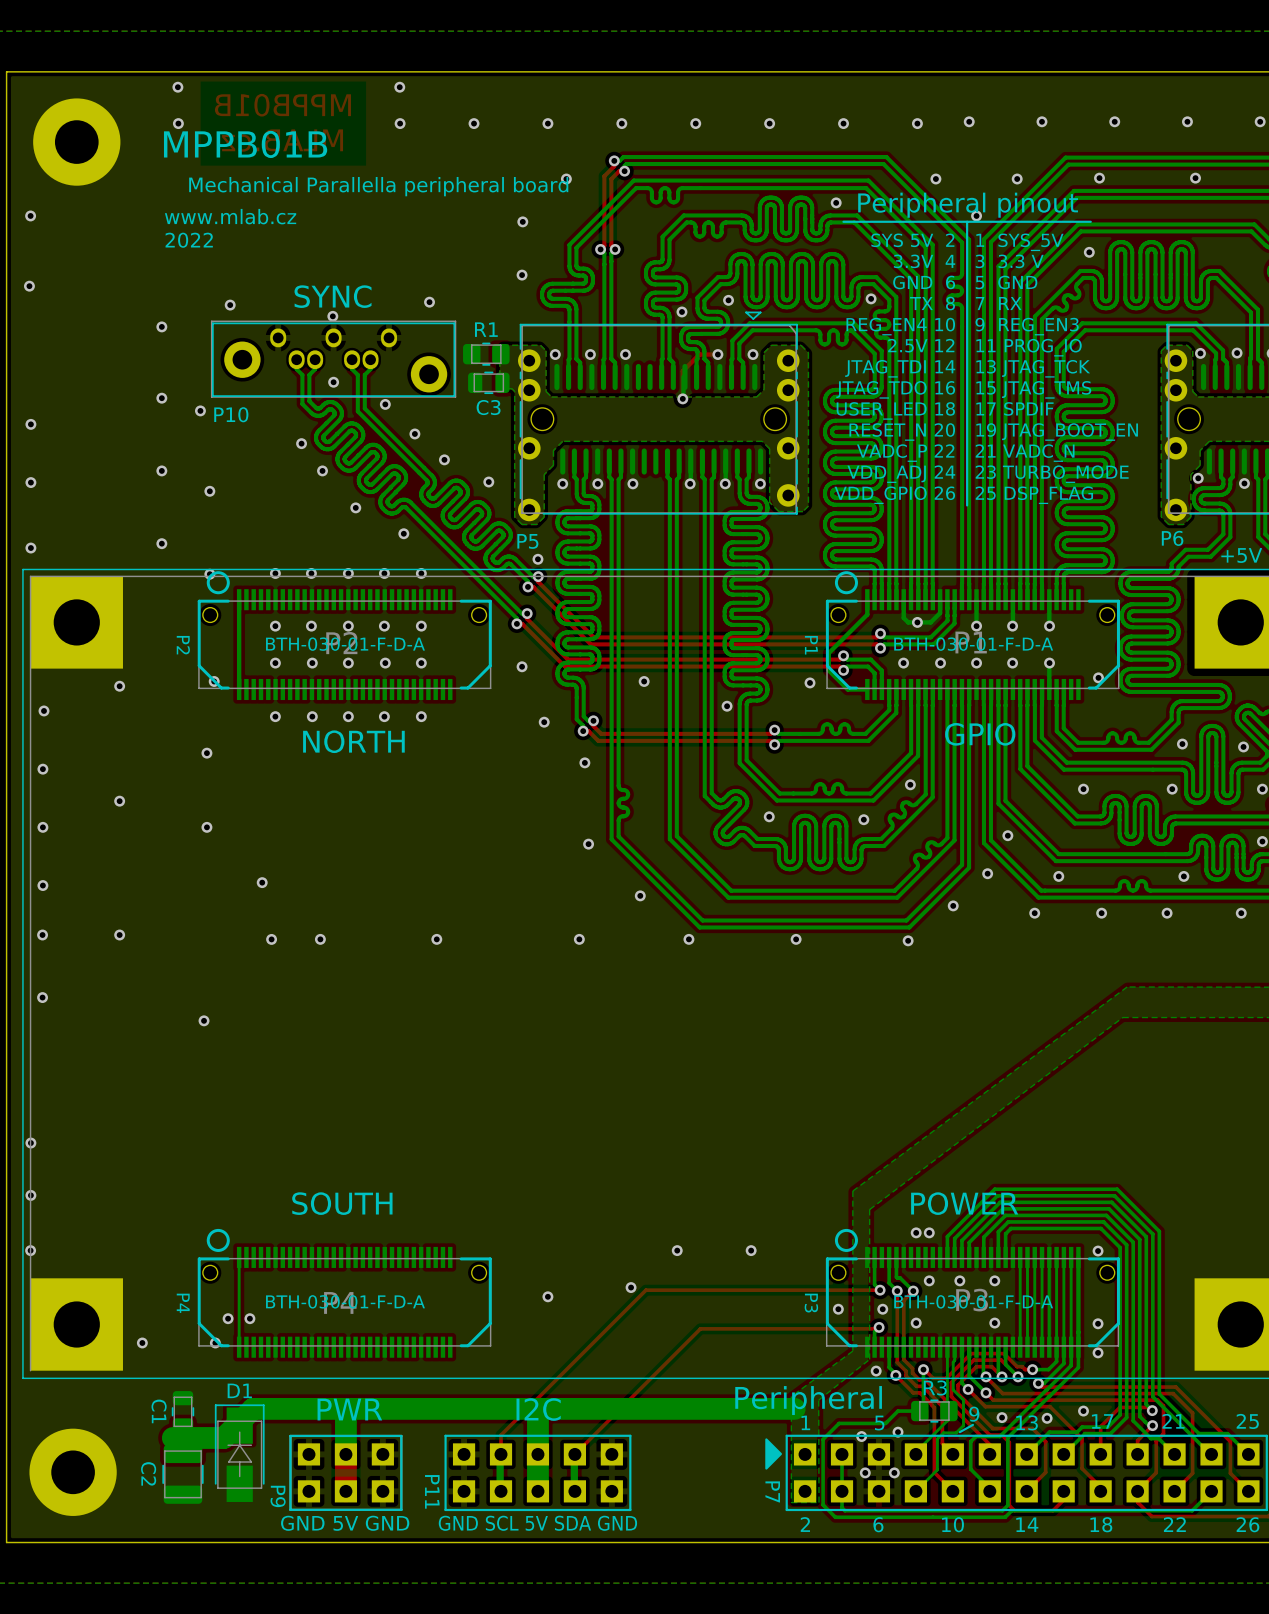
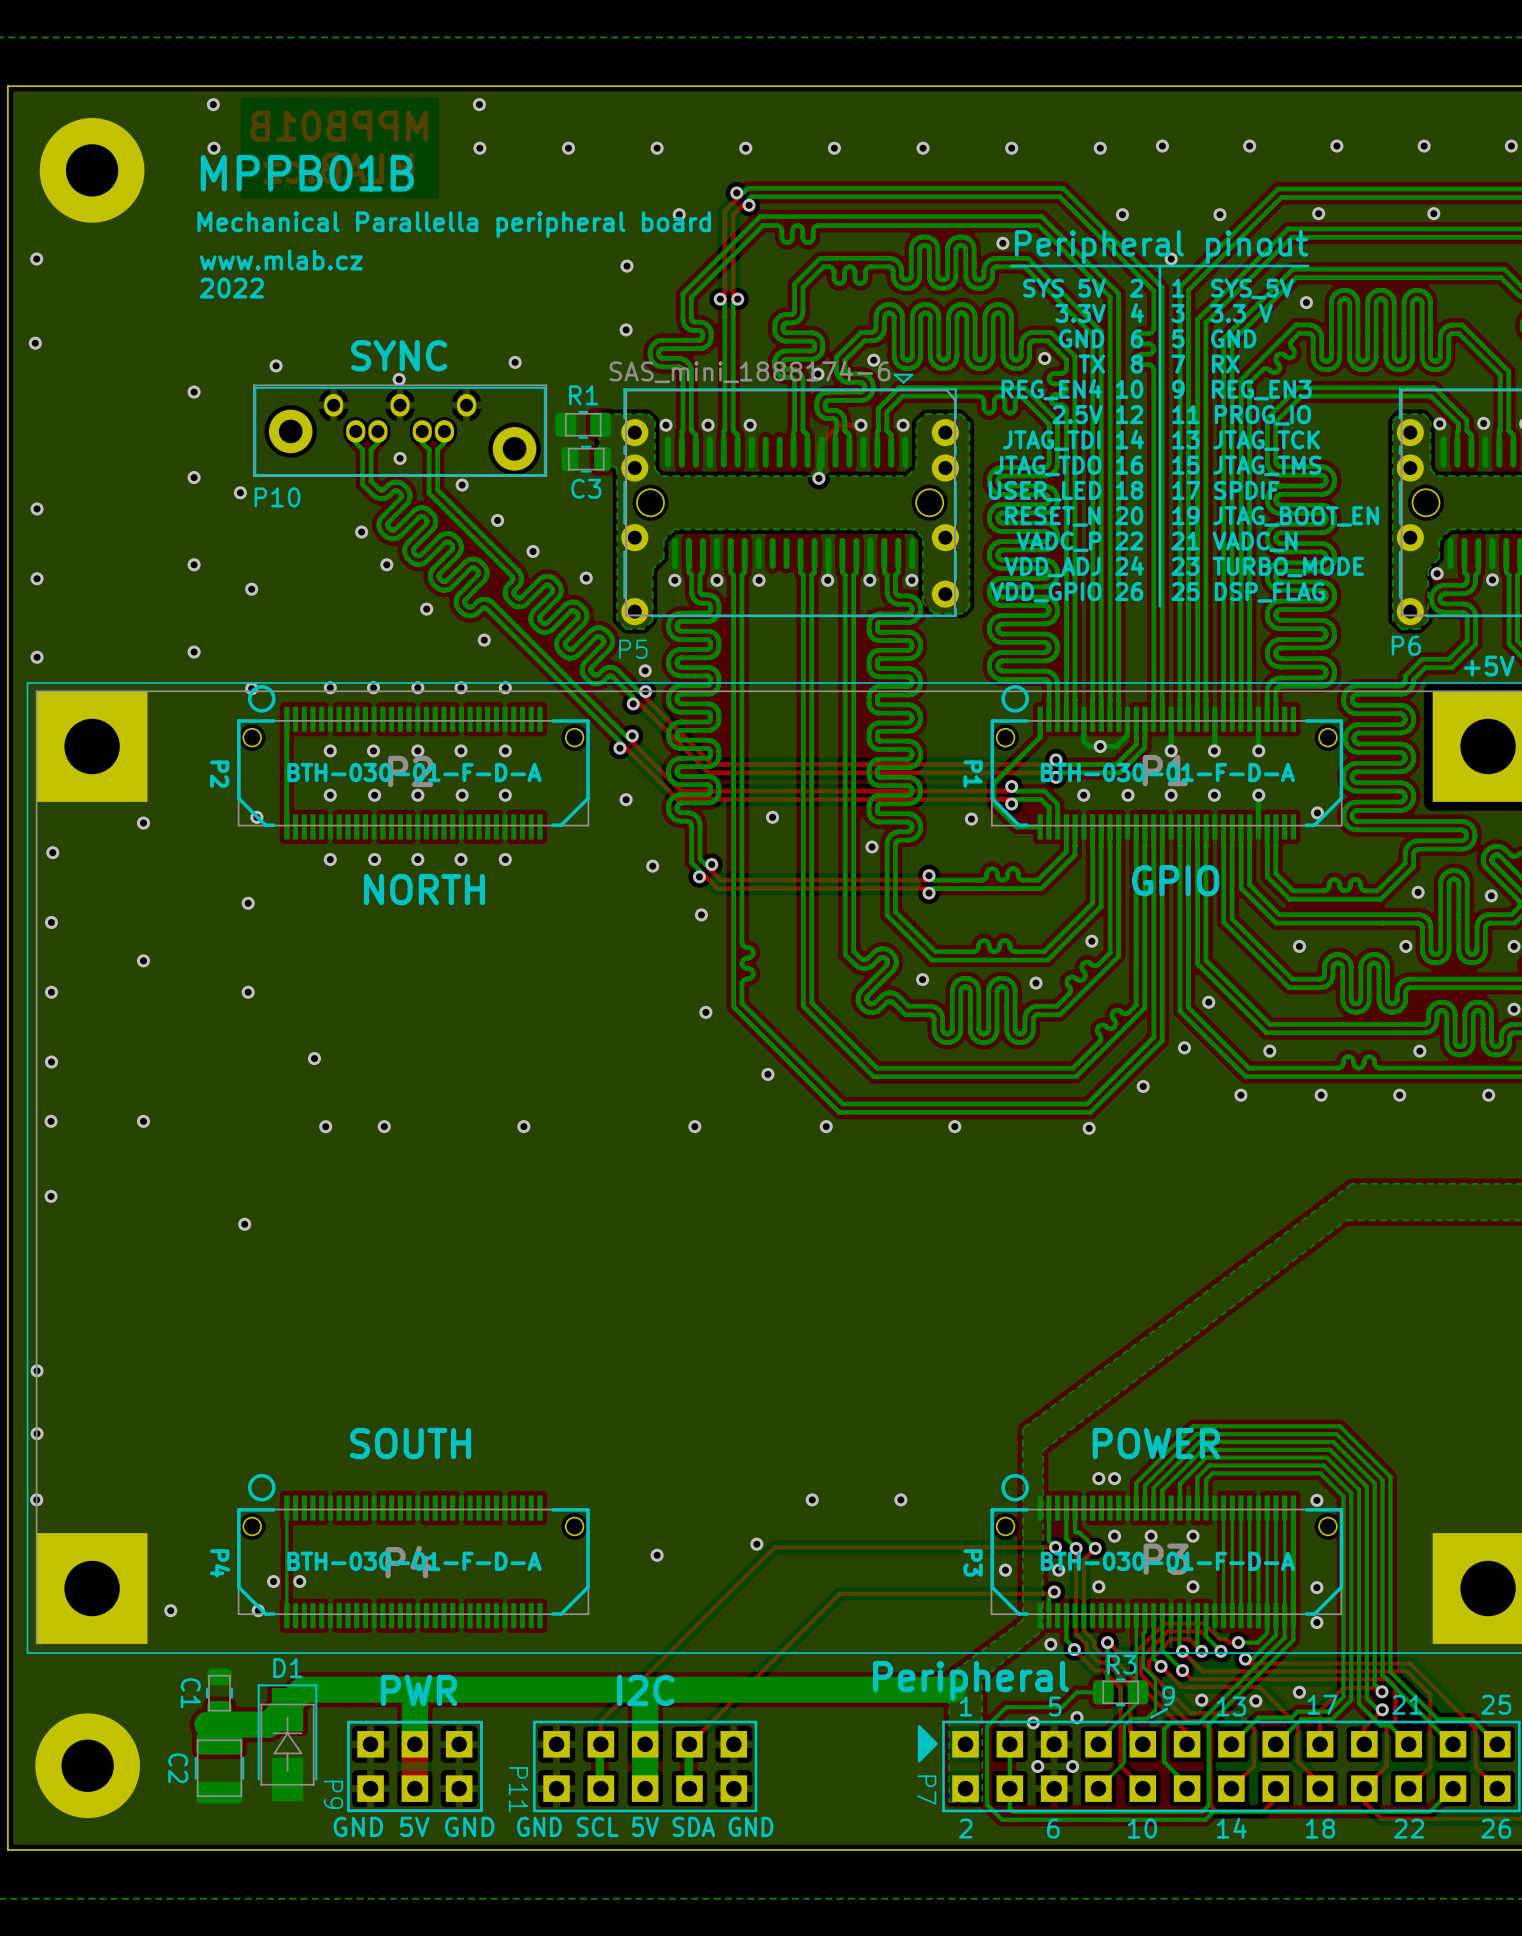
P5 value: none -> SAS_mini_1888174-6 (749, 371)

